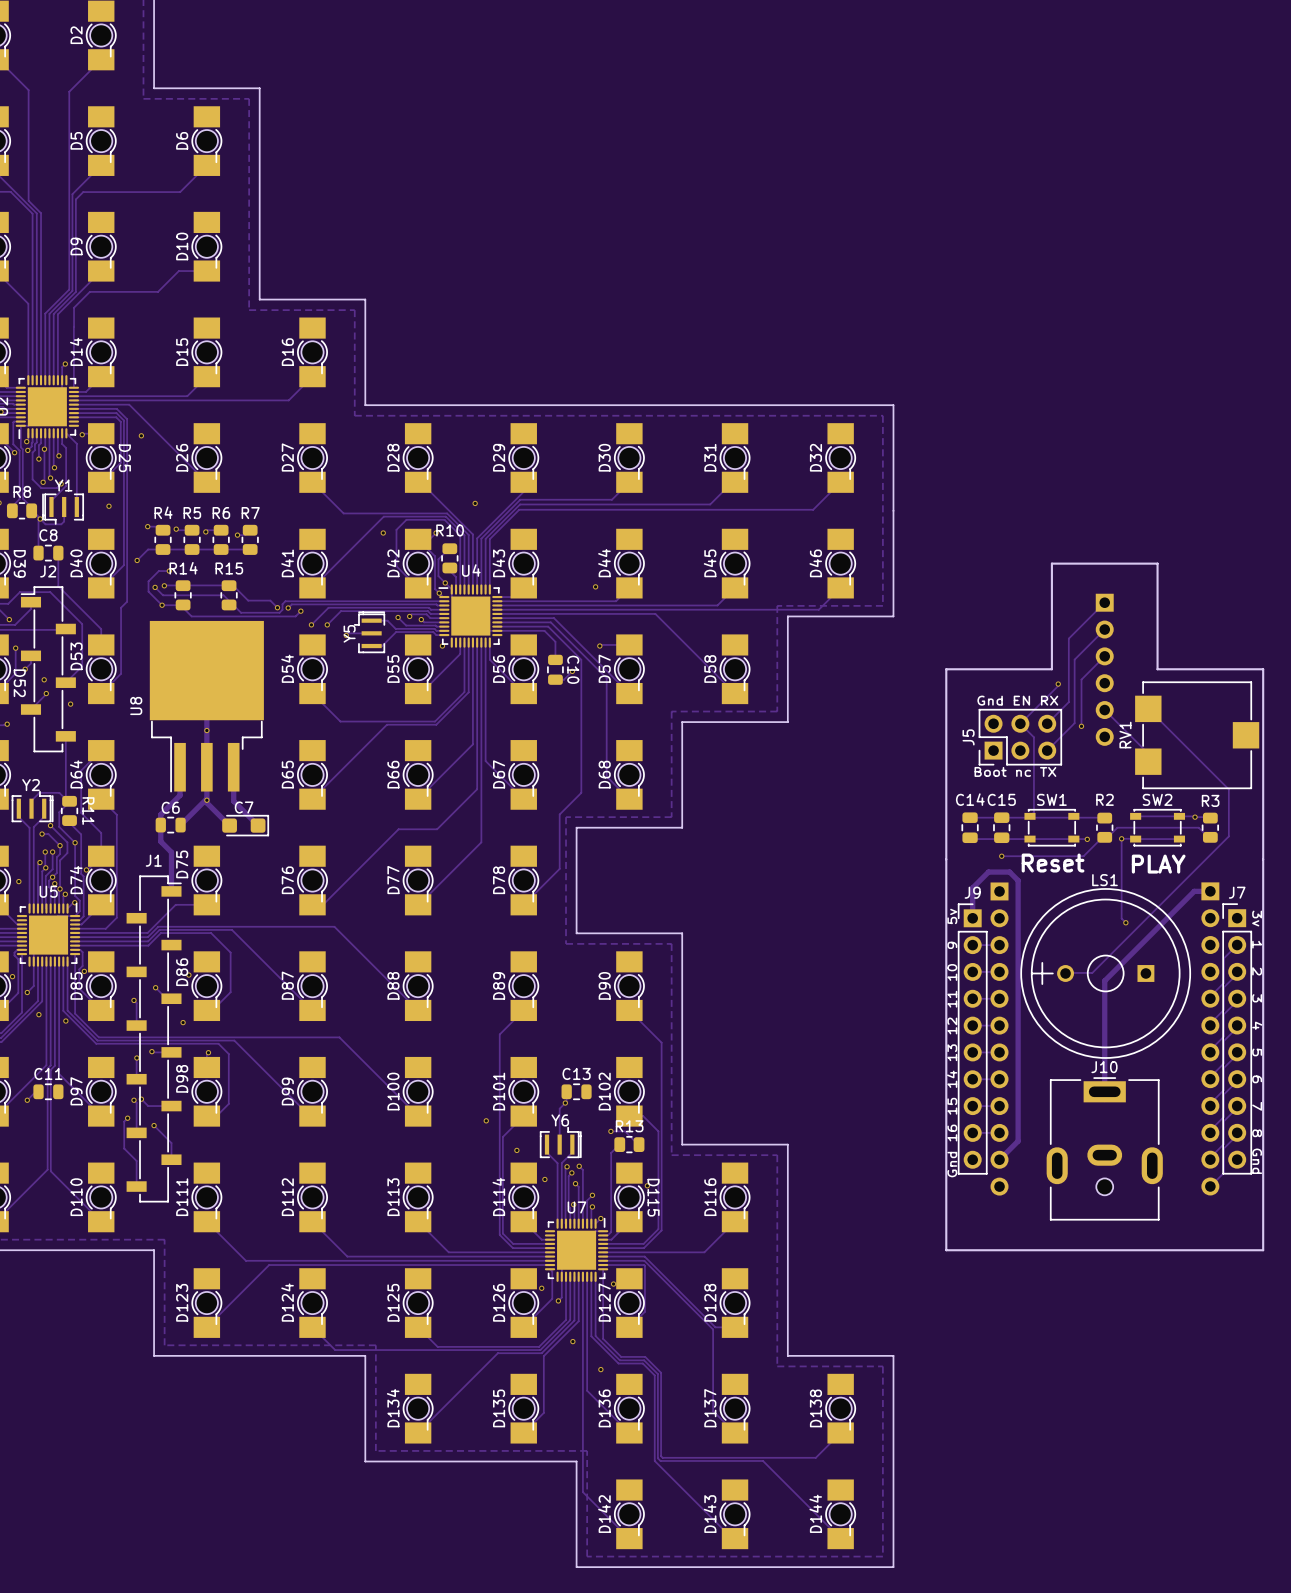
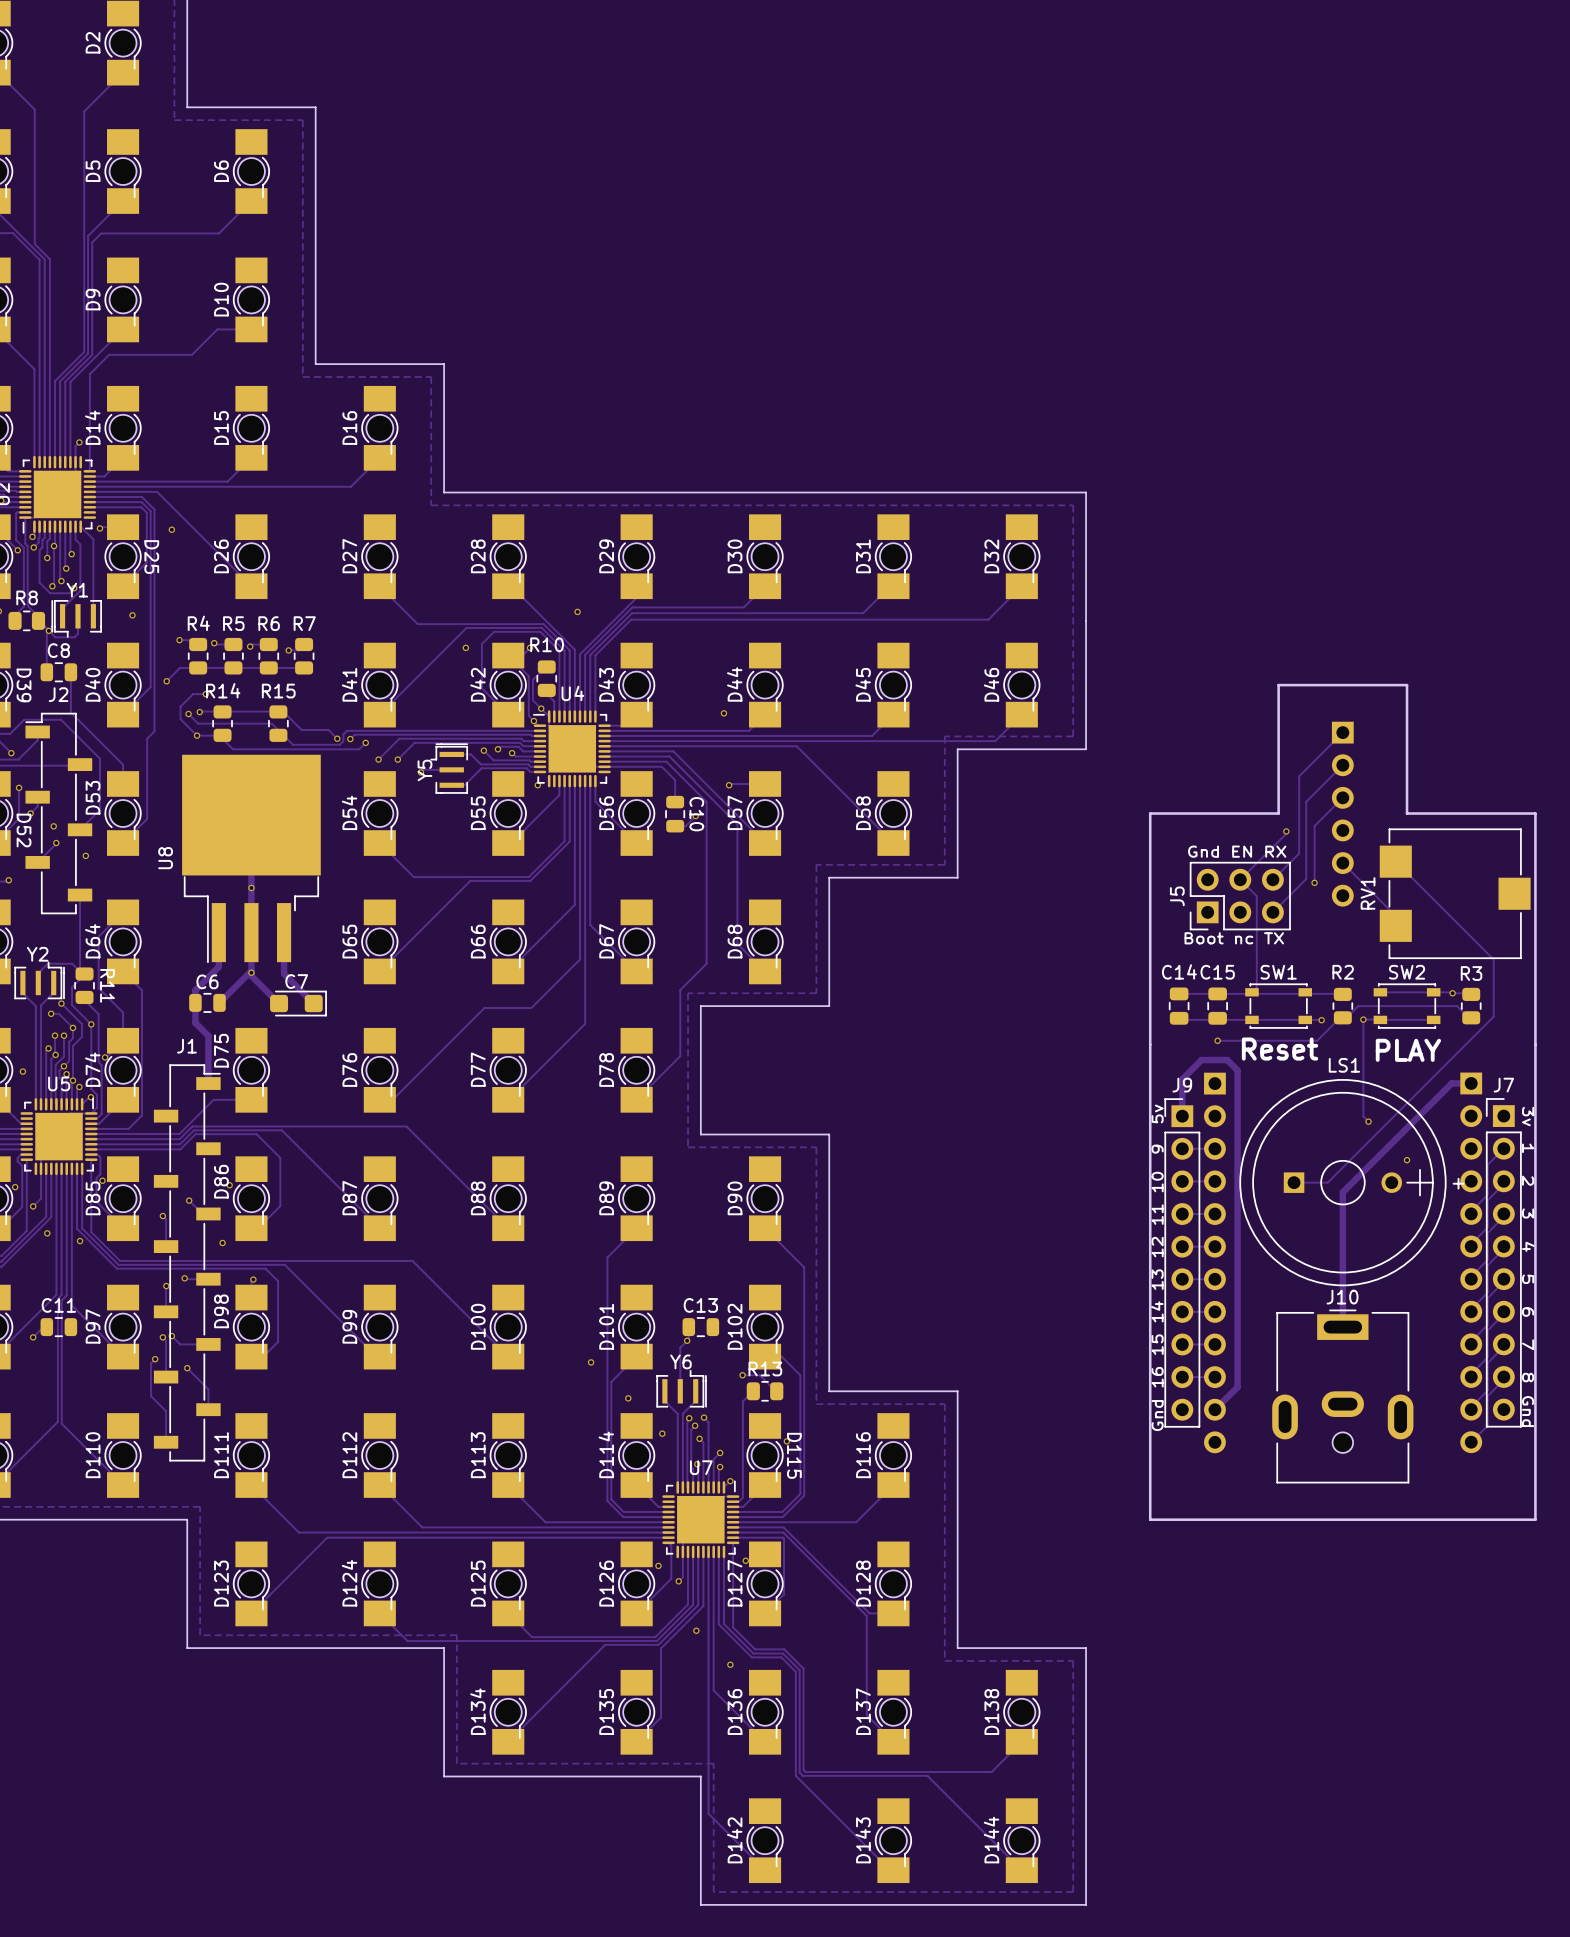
LS1 footprint: [1020, 888, 1191, 1059] -> [1239, 1079, 1447, 1287]
via: none -> (1407, 1160)

